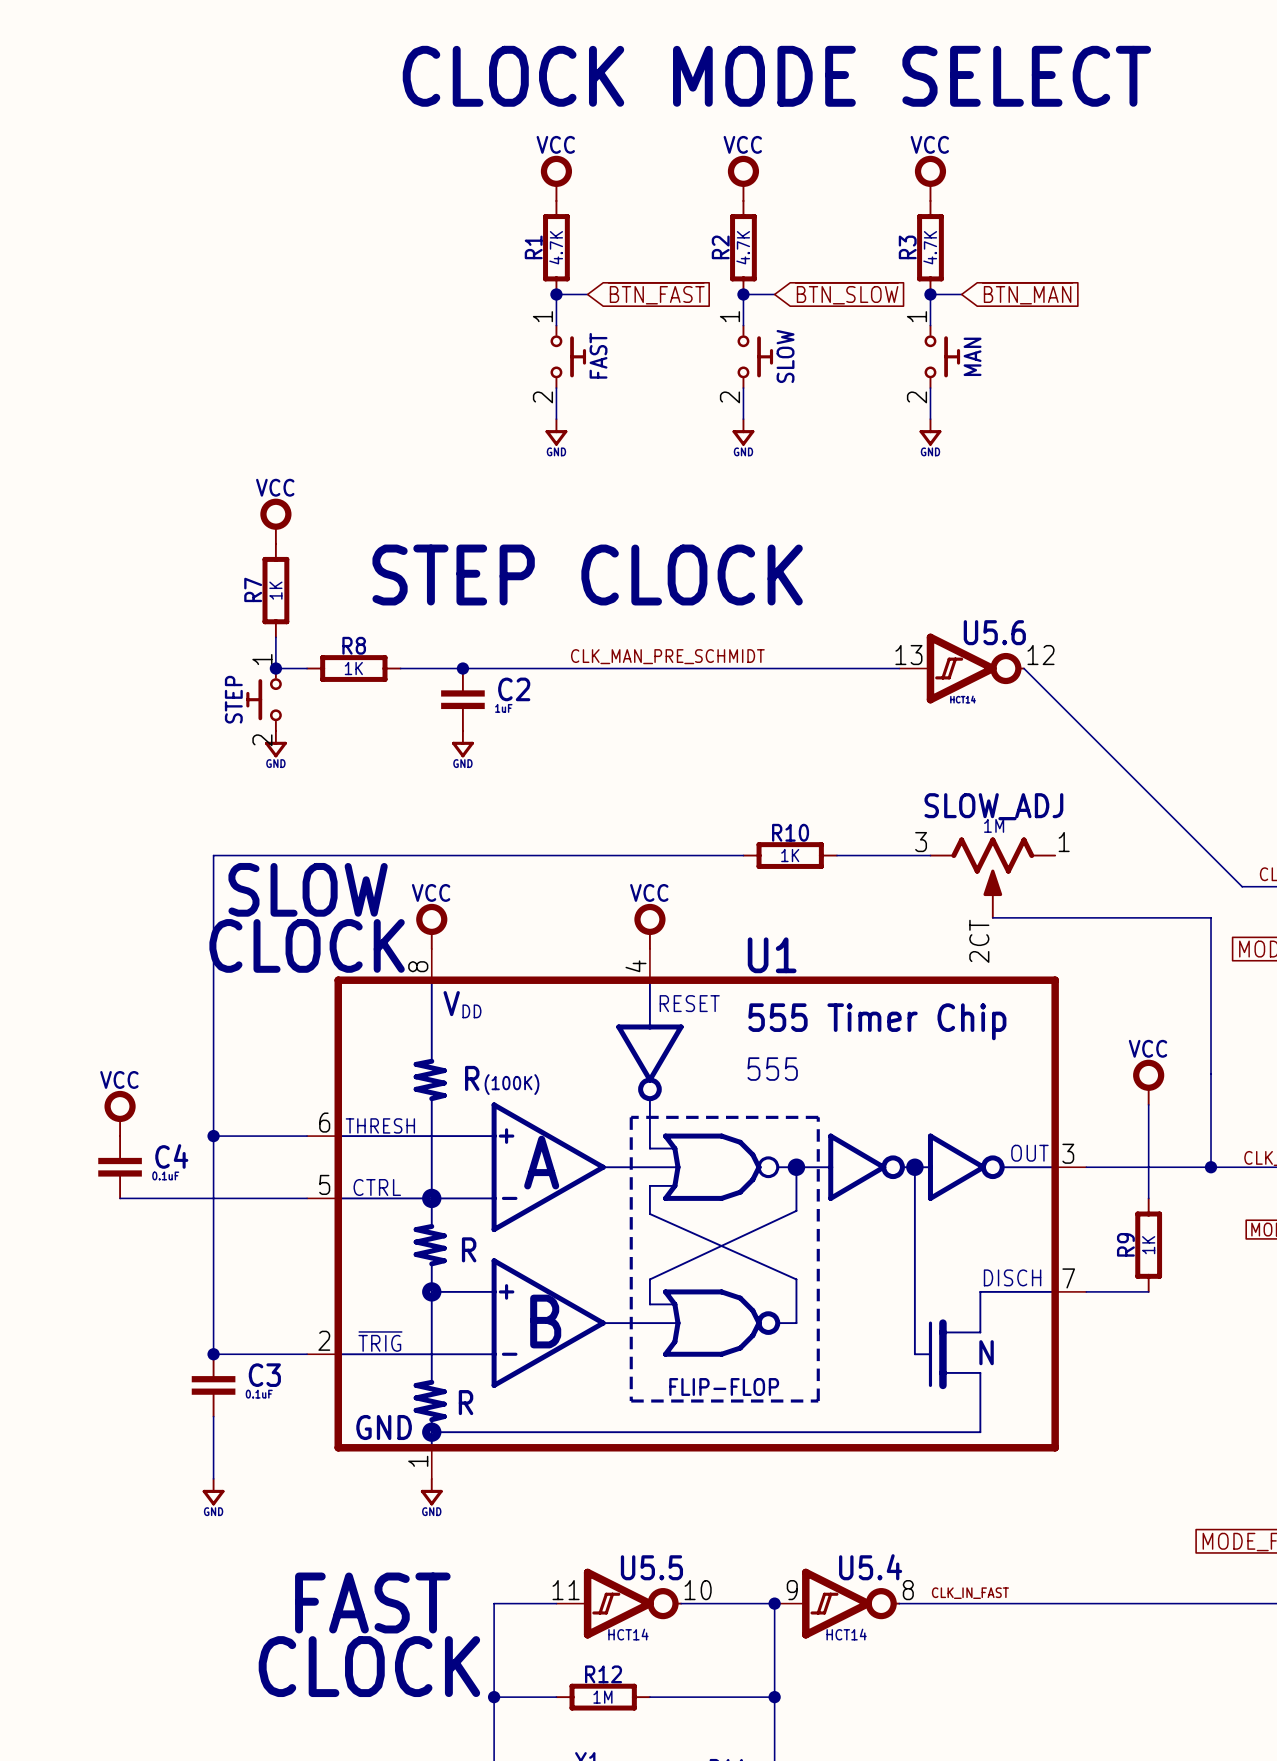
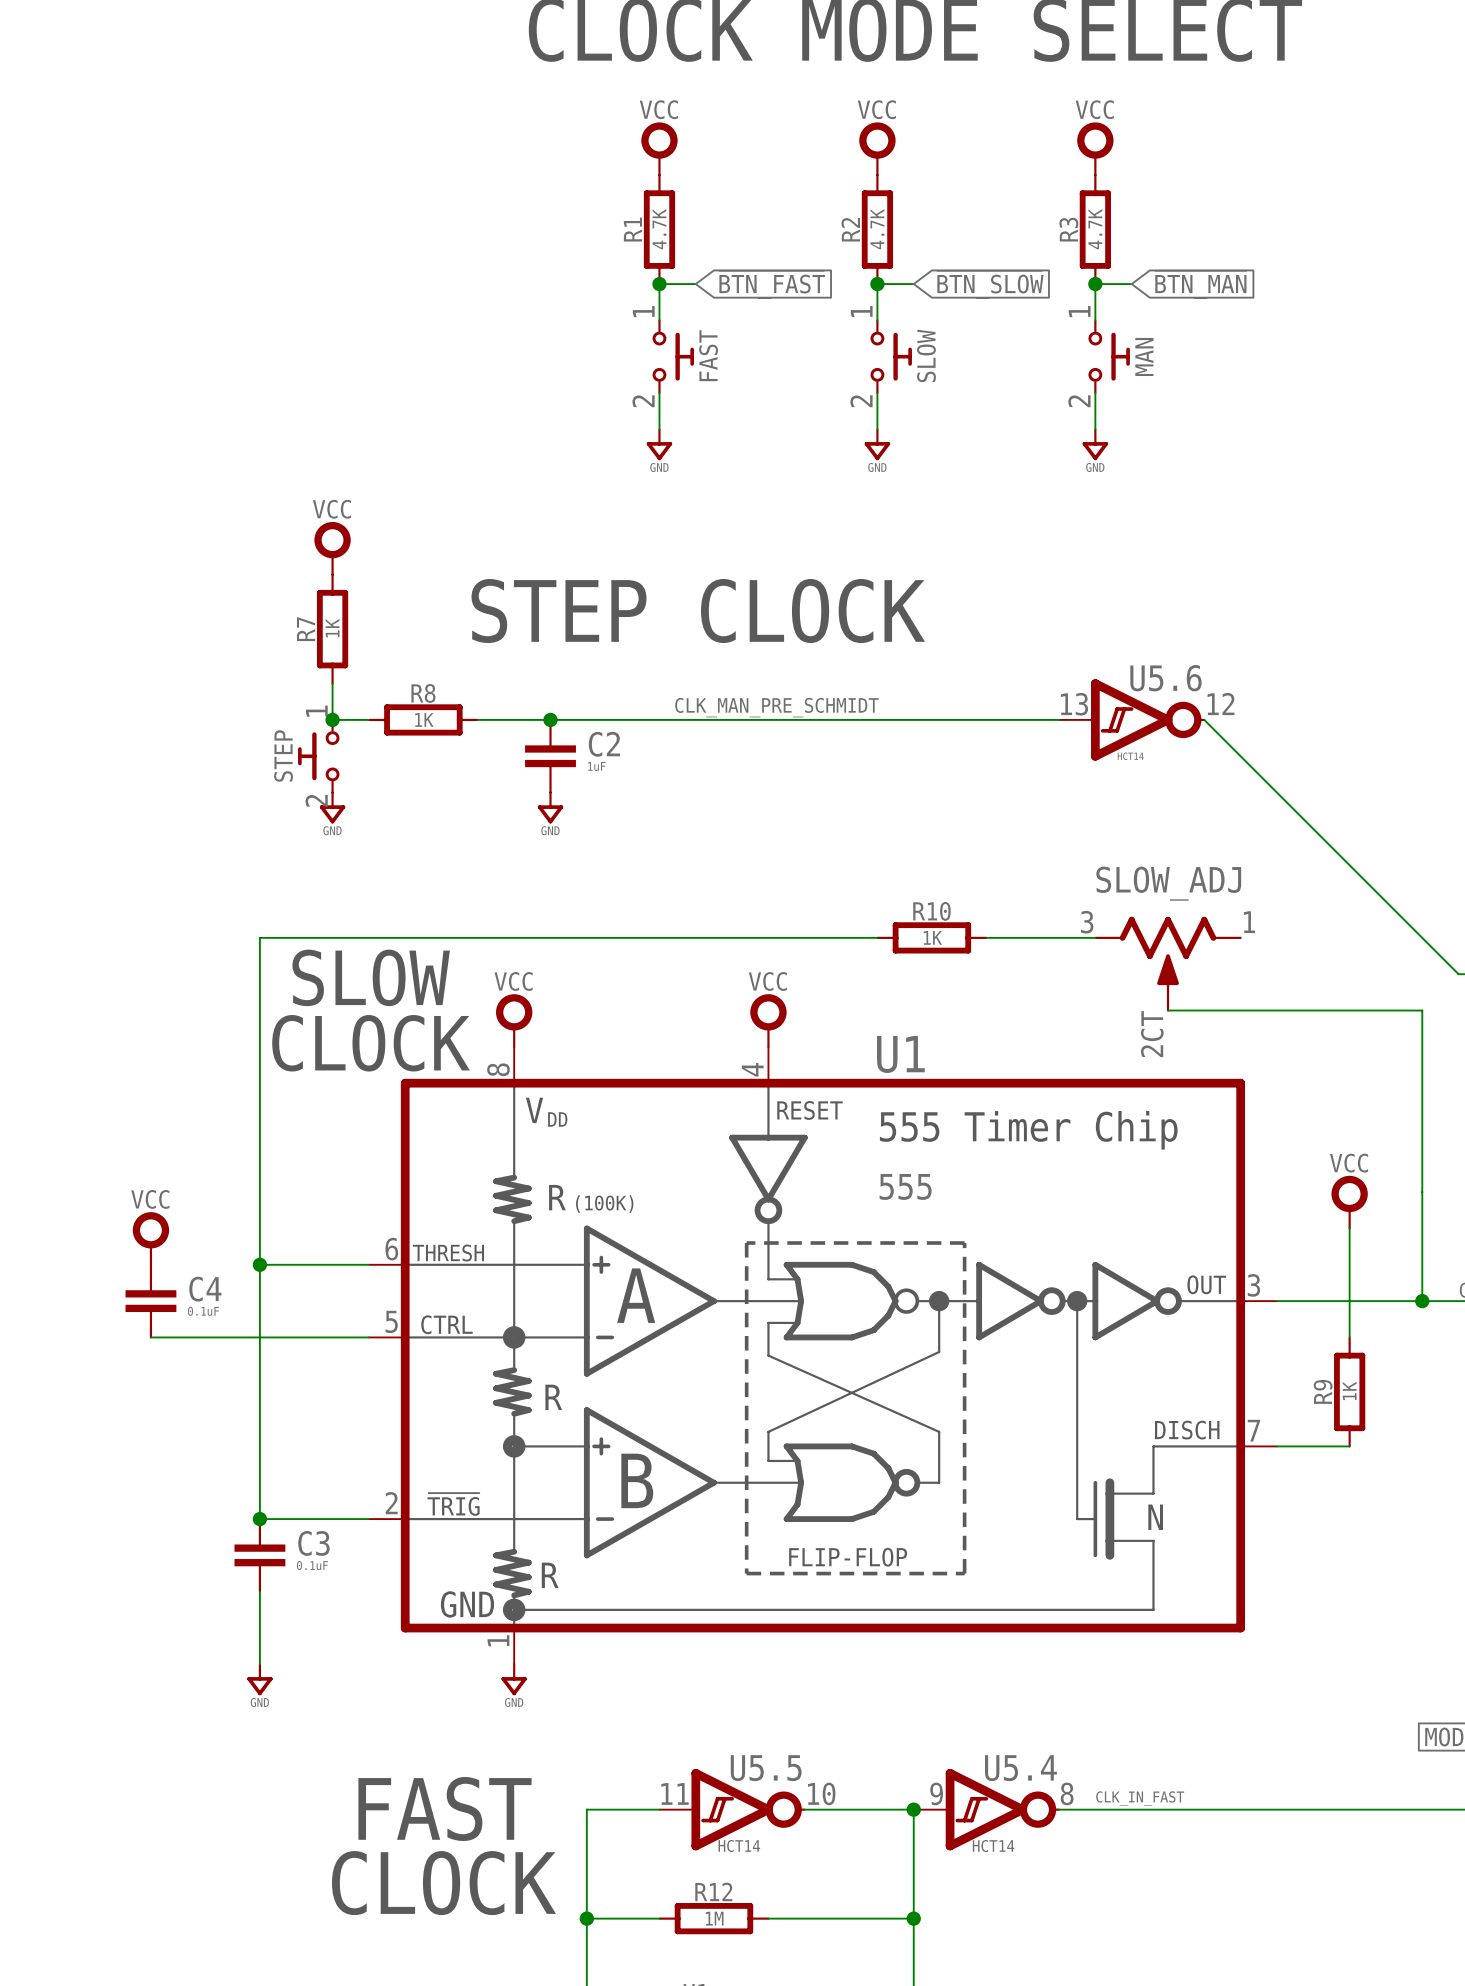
SLOW_ADJ value: 1M (994, 825) -> none

